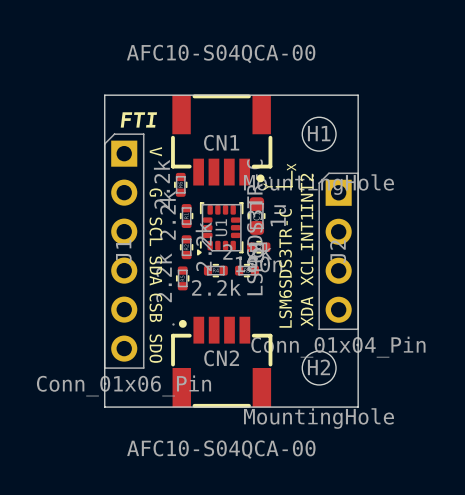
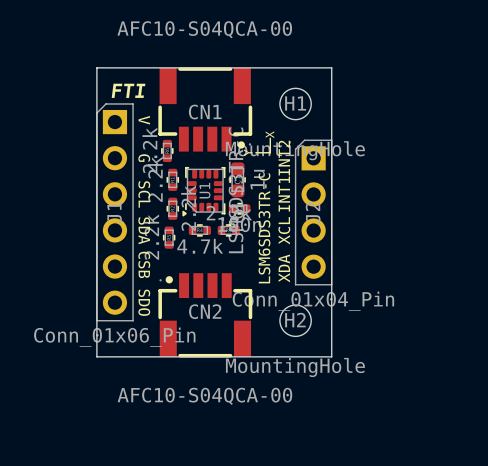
part value: 2.2k (216, 287) -> 4.7k (200, 246)

